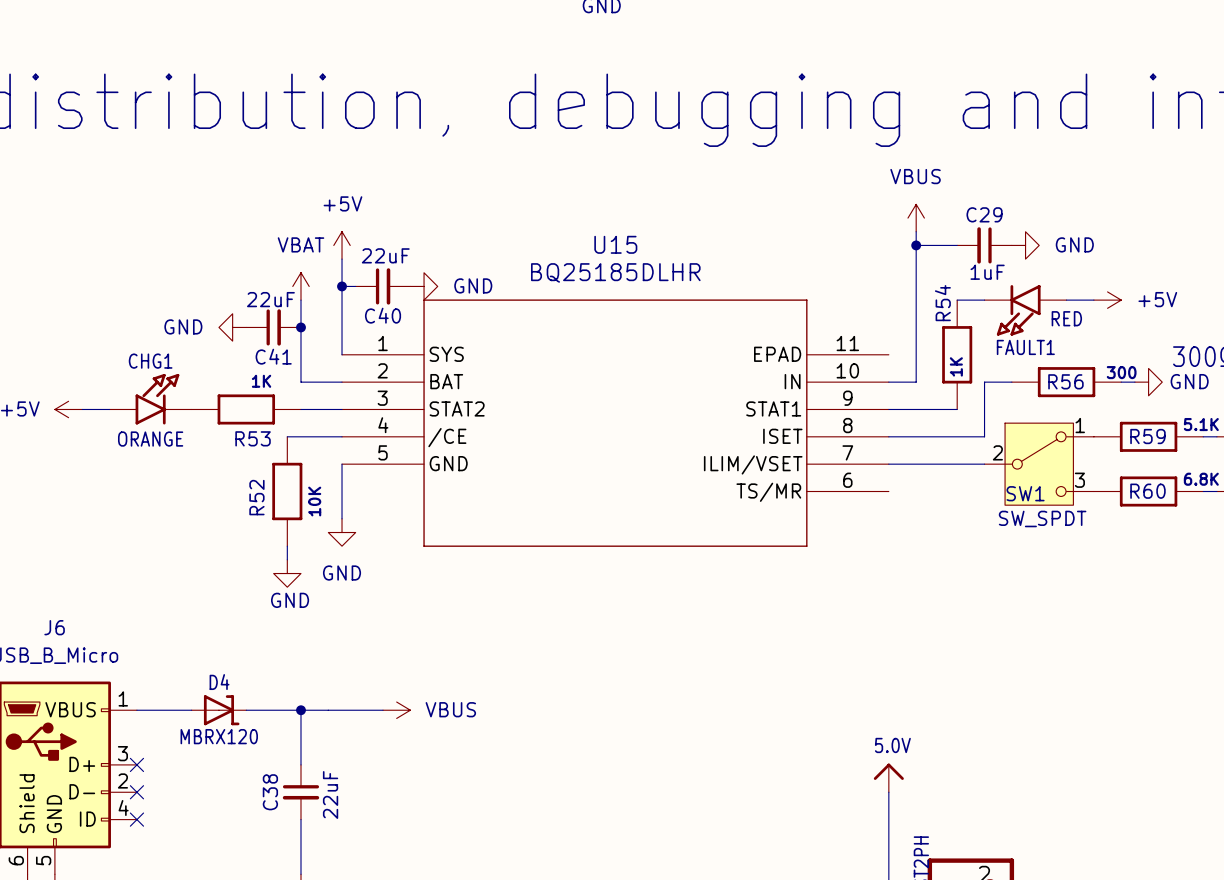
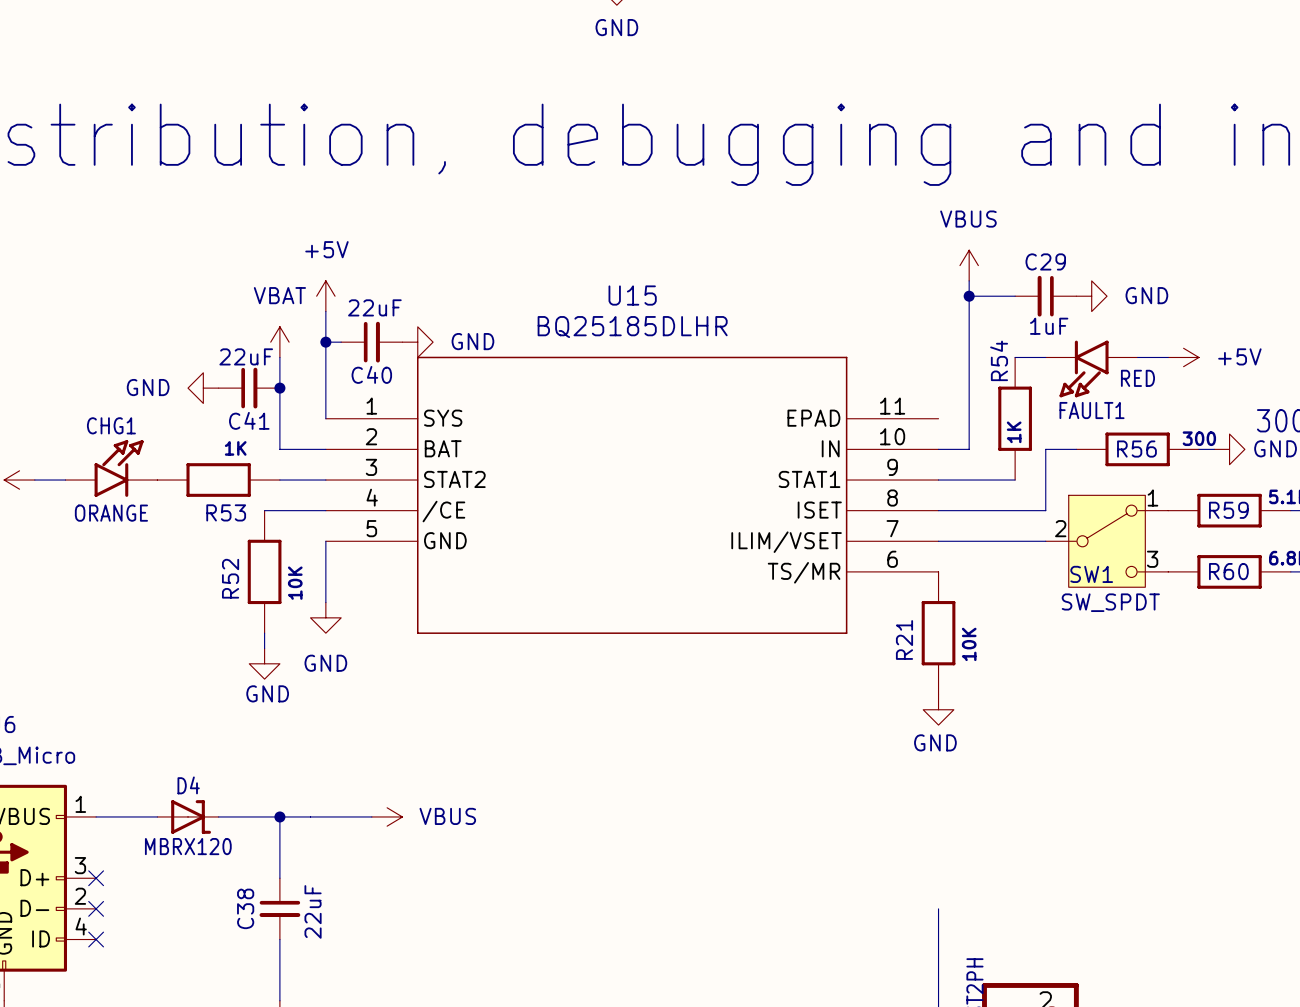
R21: none -> 10K (938, 633)
power symbol: none -> GND (938, 709)
power symbol: 5.0V (888, 777) -> none

